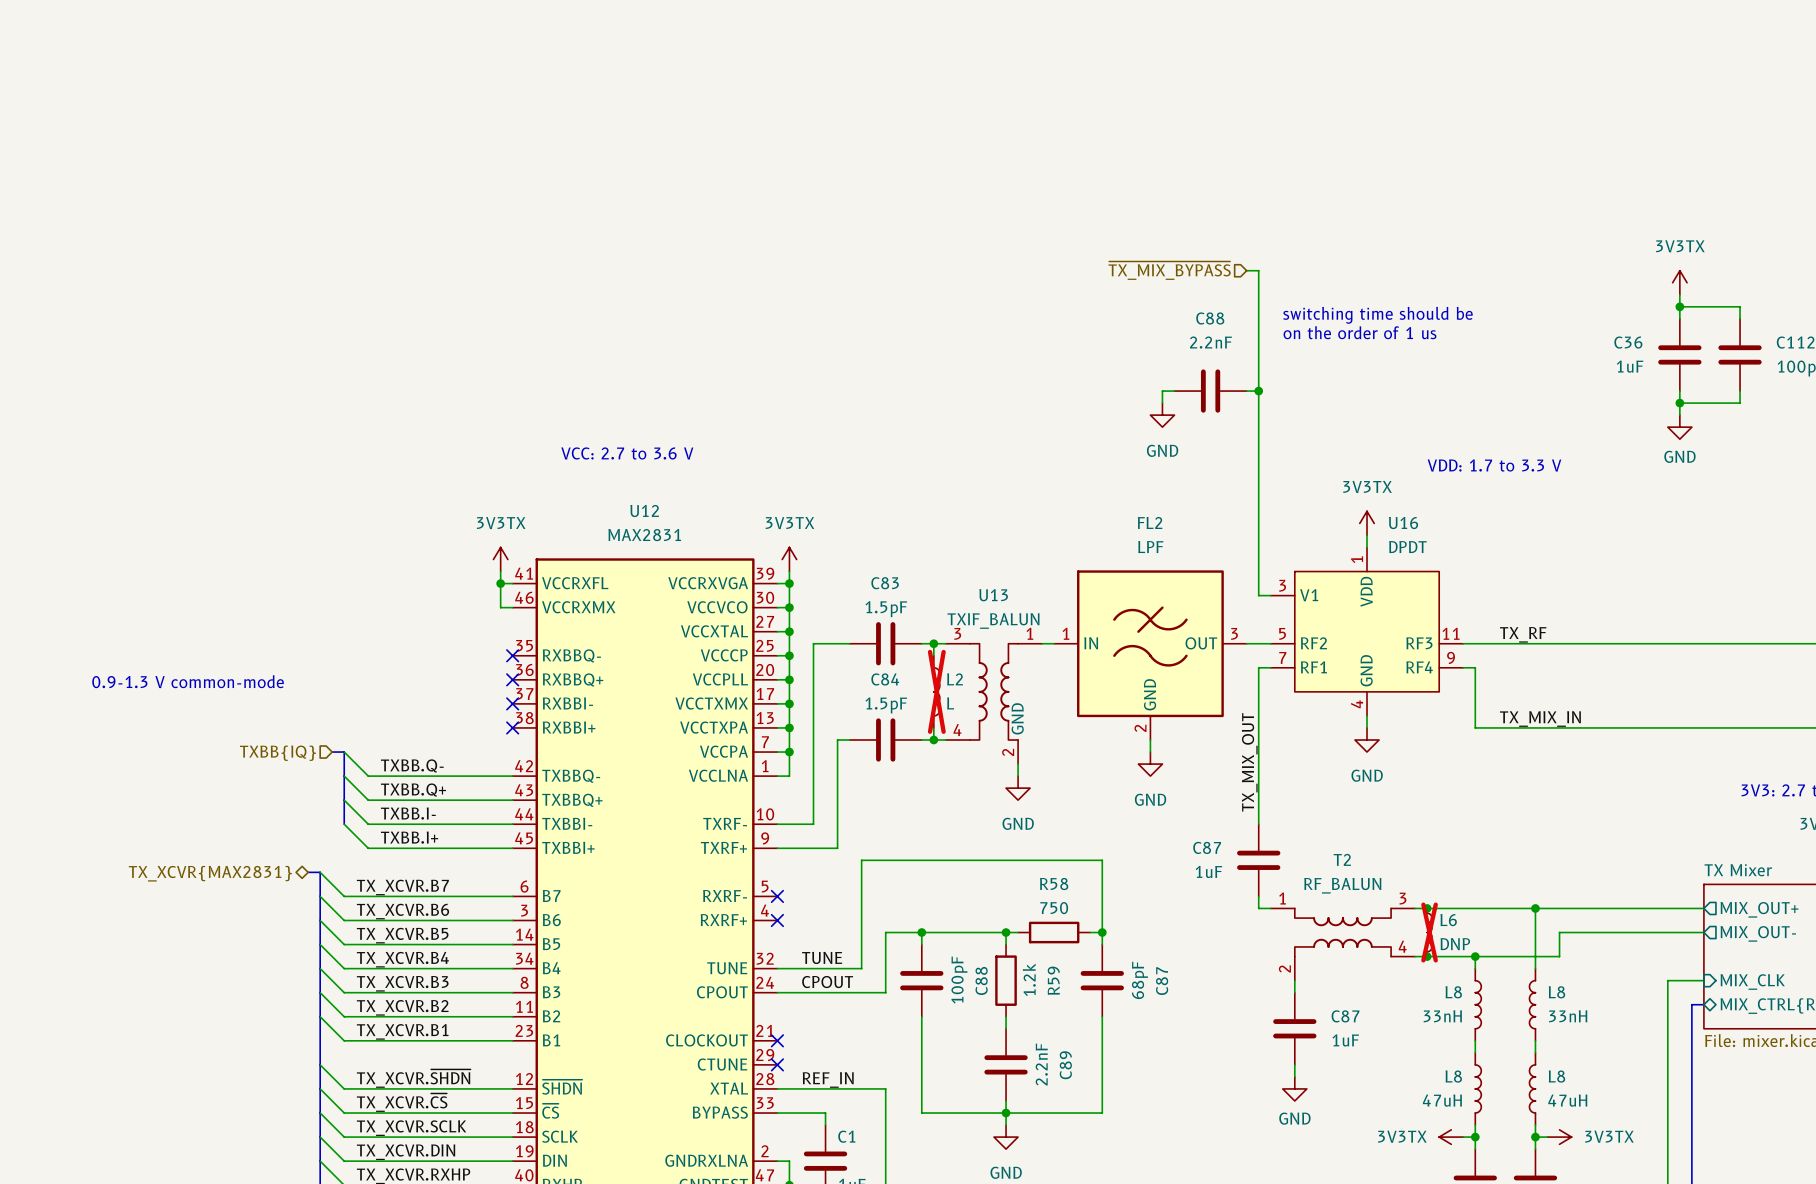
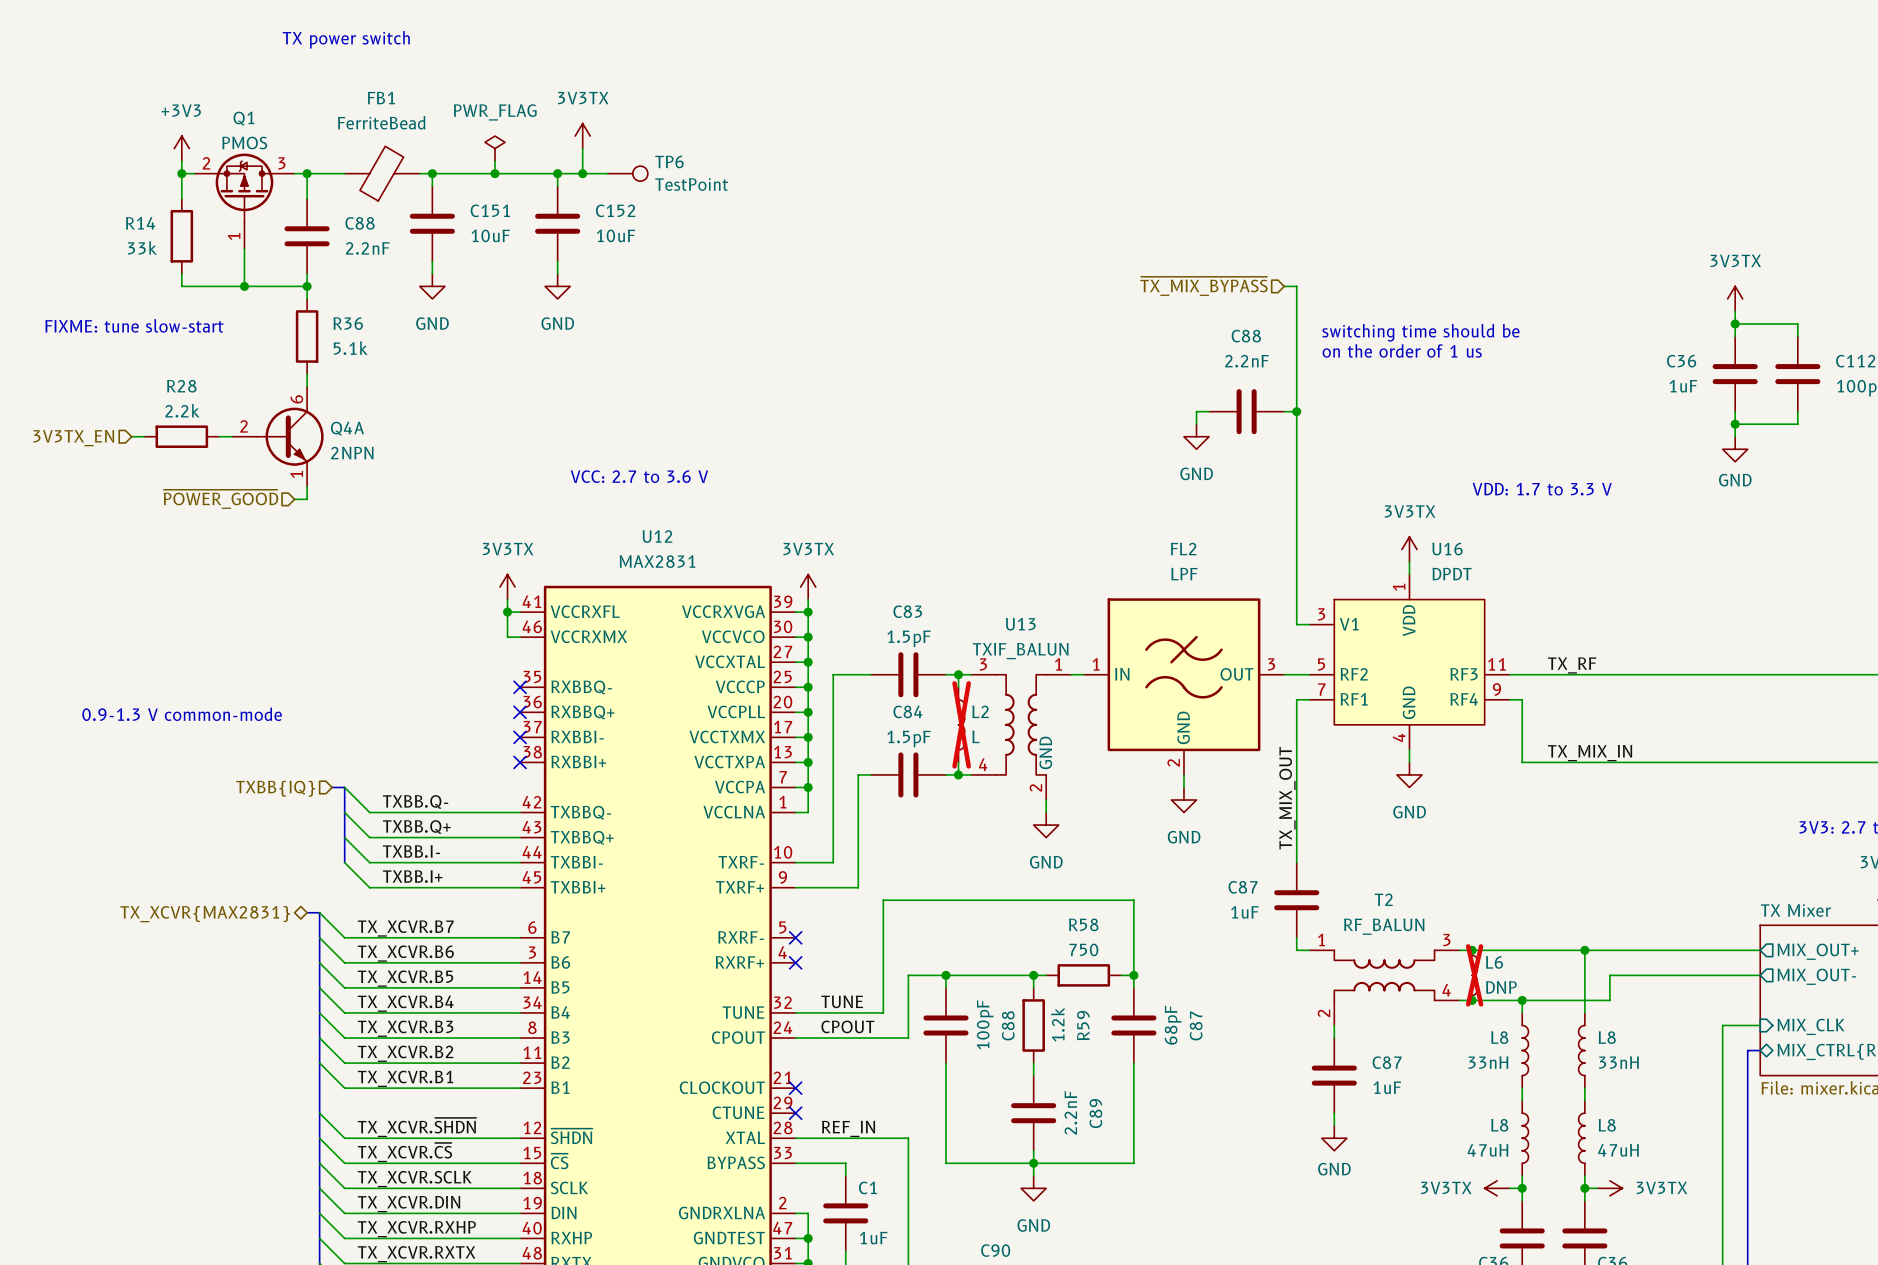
text: none -> TX power switch (346, 39)
power symbol: none -> 3V3TX (582, 136)
power symbol: none -> +3V3 (181, 148)
power symbol: none -> PWR_FLAG (495, 148)
wire: none -> (582, 148) (582, 173)
wire: none -> (181, 161) (181, 198)
wire: none -> (495, 161) (495, 173)
wire: none -> (181, 173) (194, 173)
junction: none -> (181, 173)
wire: none -> (294, 173) (344, 173)
wire: none -> (307, 173) (307, 198)
junction: none -> (307, 173)
FB1: none -> FerriteBead (382, 173)
wire: none -> (419, 173) (607, 173)
wire: none -> (432, 173) (432, 186)
junction: none -> (432, 173)
junction: none -> (495, 173)
wire: none -> (557, 173) (557, 186)
junction: none -> (557, 173)
junction: none -> (582, 173)
TP6: none -> TestPoint (627, 173)
Q1: none -> PMOS (244, 201)
C151: none -> 10uF (432, 223)
C152: none -> 10uF (557, 223)
R14: none -> 33k (181, 236)
C88: none -> 2.2nF (307, 236)
wire: none -> (244, 248) (244, 286)
wire: none -> (432, 261) (432, 273)
wire: none -> (557, 261) (557, 273)
wire: none -> (181, 273) (181, 286) (307, 286)
wire: none -> (307, 273) (307, 298)
junction: none -> (244, 286)
junction: none -> (307, 286)
power symbol: none -> GND (432, 286)
power symbol: none -> GND (557, 286)
text: none -> FIXME: tune slow-start (134, 325)
R36: none -> 5.1k (307, 336)
wire: none -> (307, 374) (307, 386)
wire: none -> (131, 436) (144, 436)
R28: none -> 2.2k (181, 436)
wire: none -> (219, 436) (231, 436)
Q4A: none -> 2NPN (277, 436)
hierarchical label: none -> 3V3TX_EN (73, 438)
wire: none -> (307, 486) (307, 499) (294, 499)
hierarchical label: none -> ~{POWER_GOOD} (220, 499)

